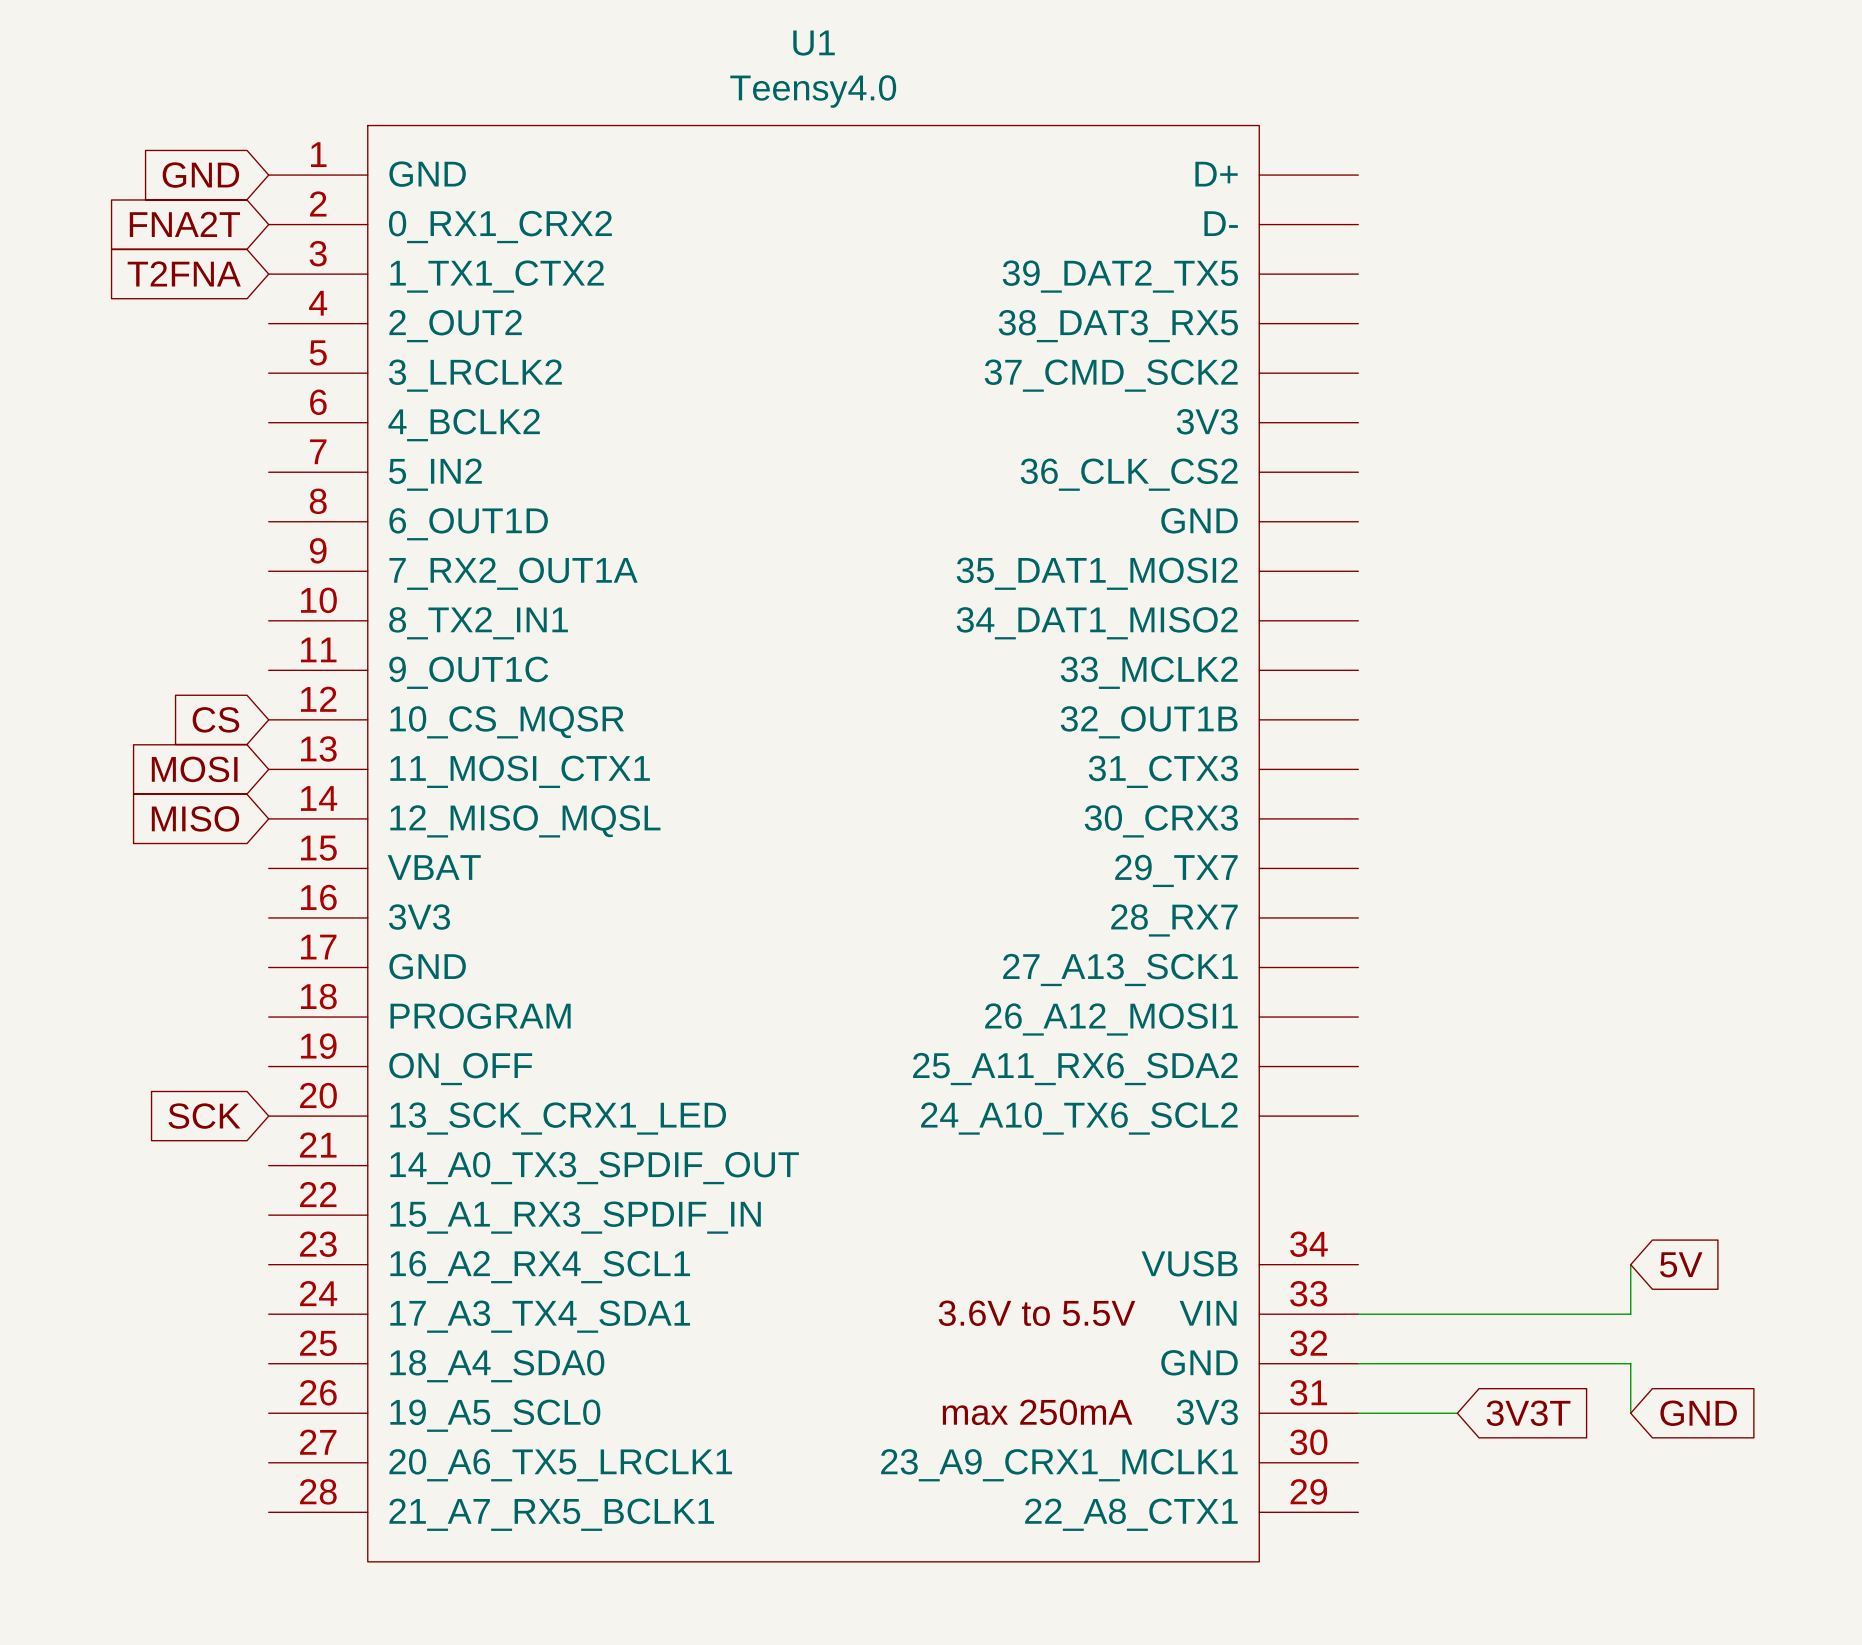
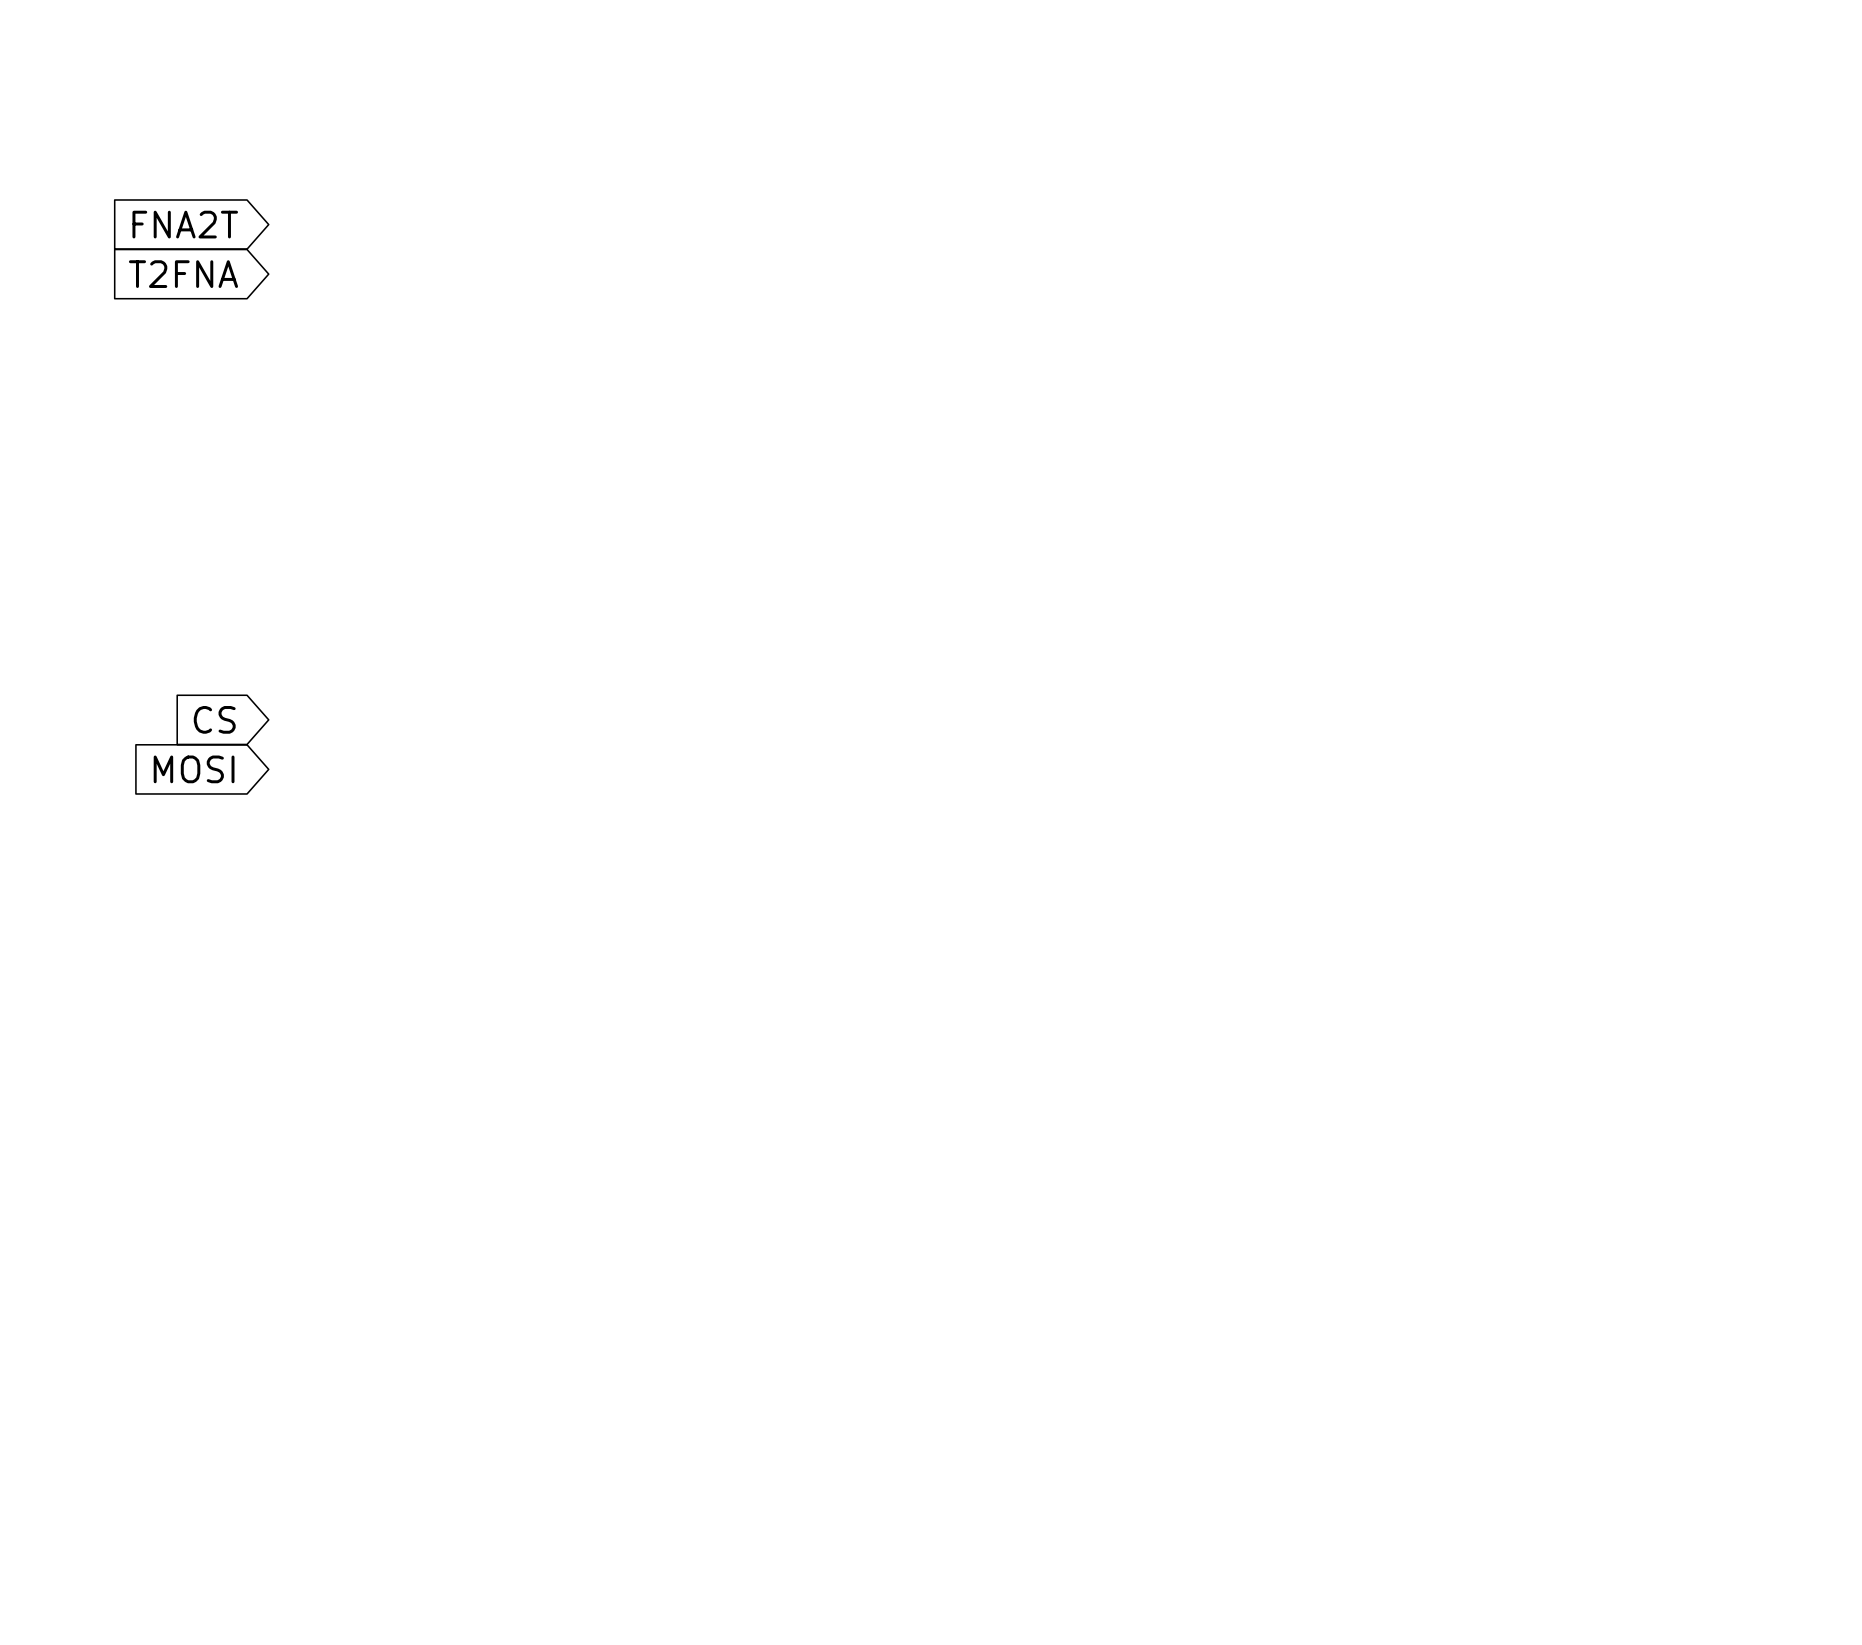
global label: GND (200, 175) -> none
global label: MISO (195, 818) -> none
U1: Teensy4.0 (813, 843) -> none
global label: SCK (204, 1116) -> none
wire: (1630, 1264) (1630, 1314) (1358, 1314) -> none
global label: 5V (1681, 1264) -> none
wire: (1358, 1363) (1630, 1363) (1630, 1413) -> none
wire: (1358, 1413) (1457, 1413) -> none
global label: 3V3T (1528, 1413) -> none
global label: GND (1698, 1413) -> none

